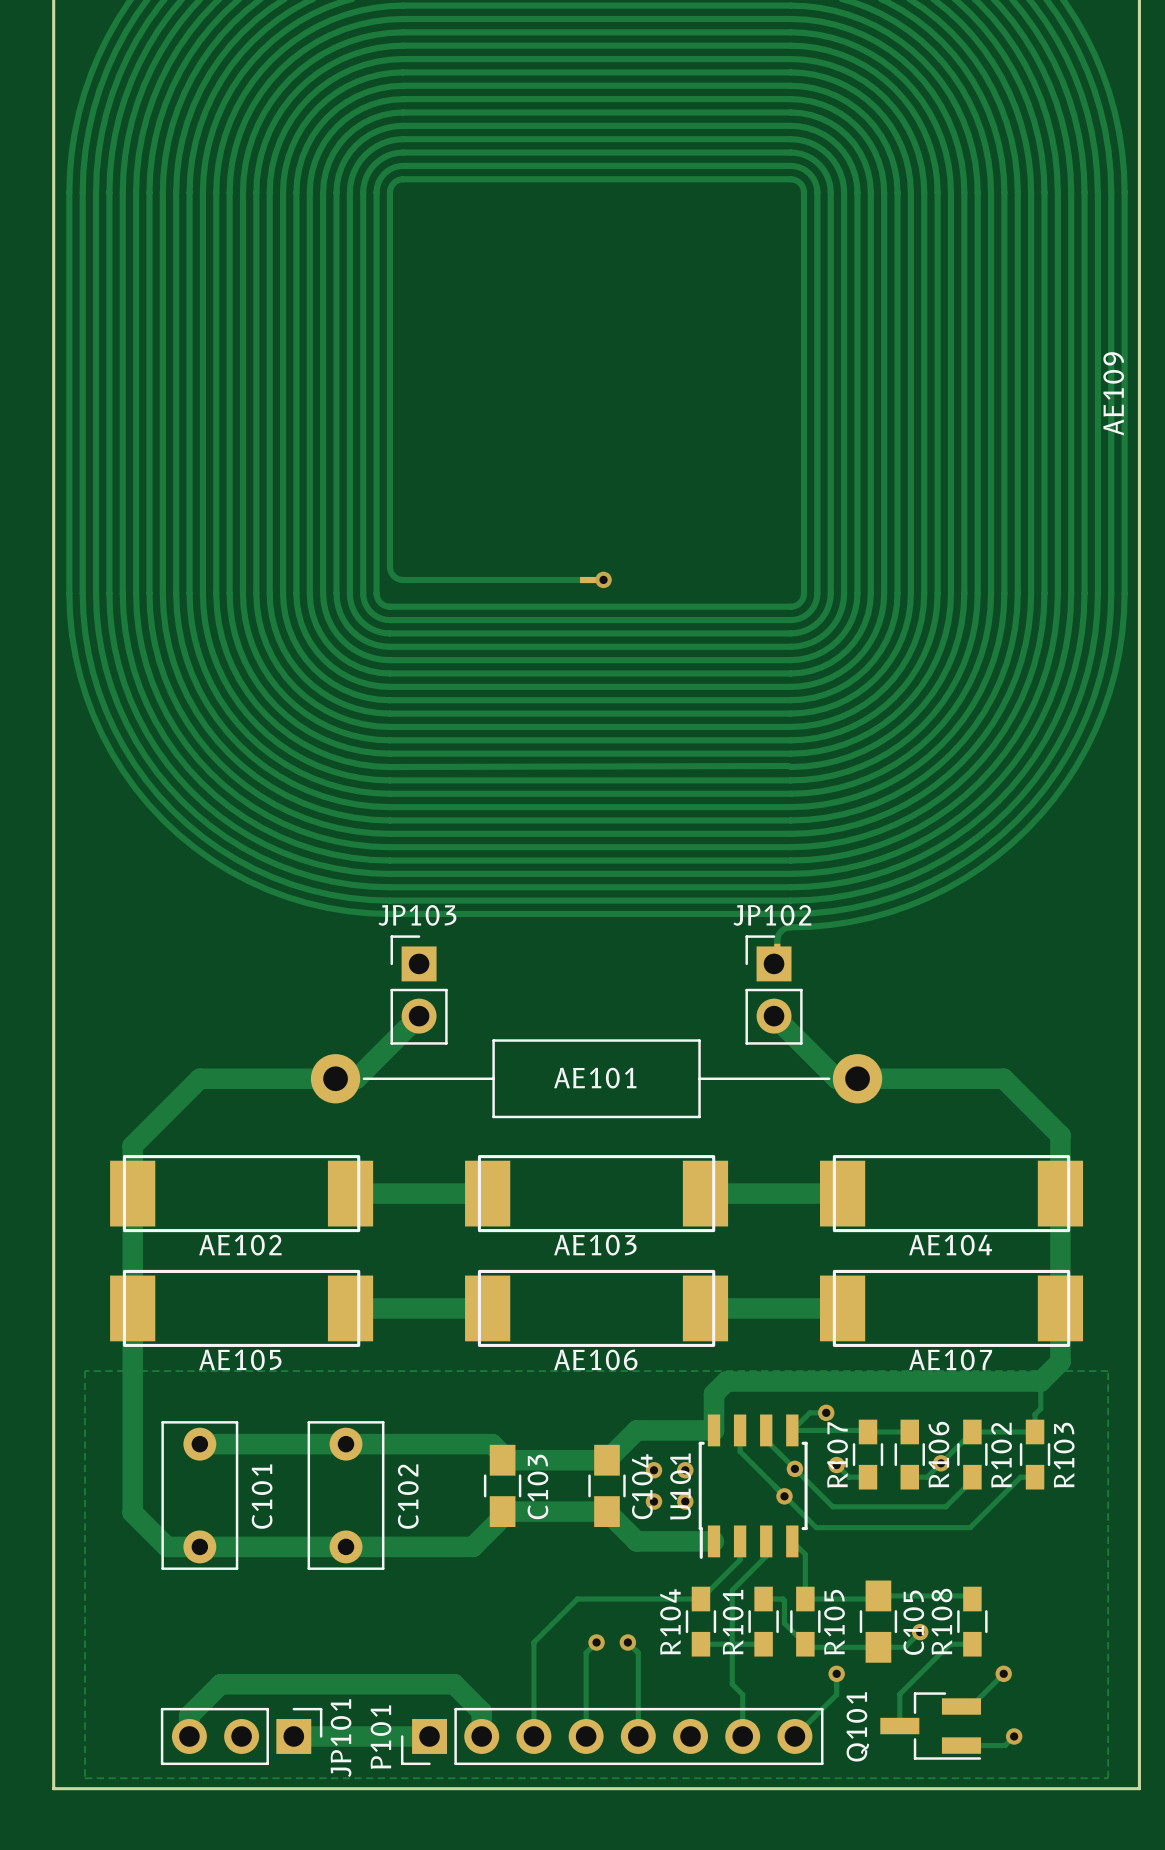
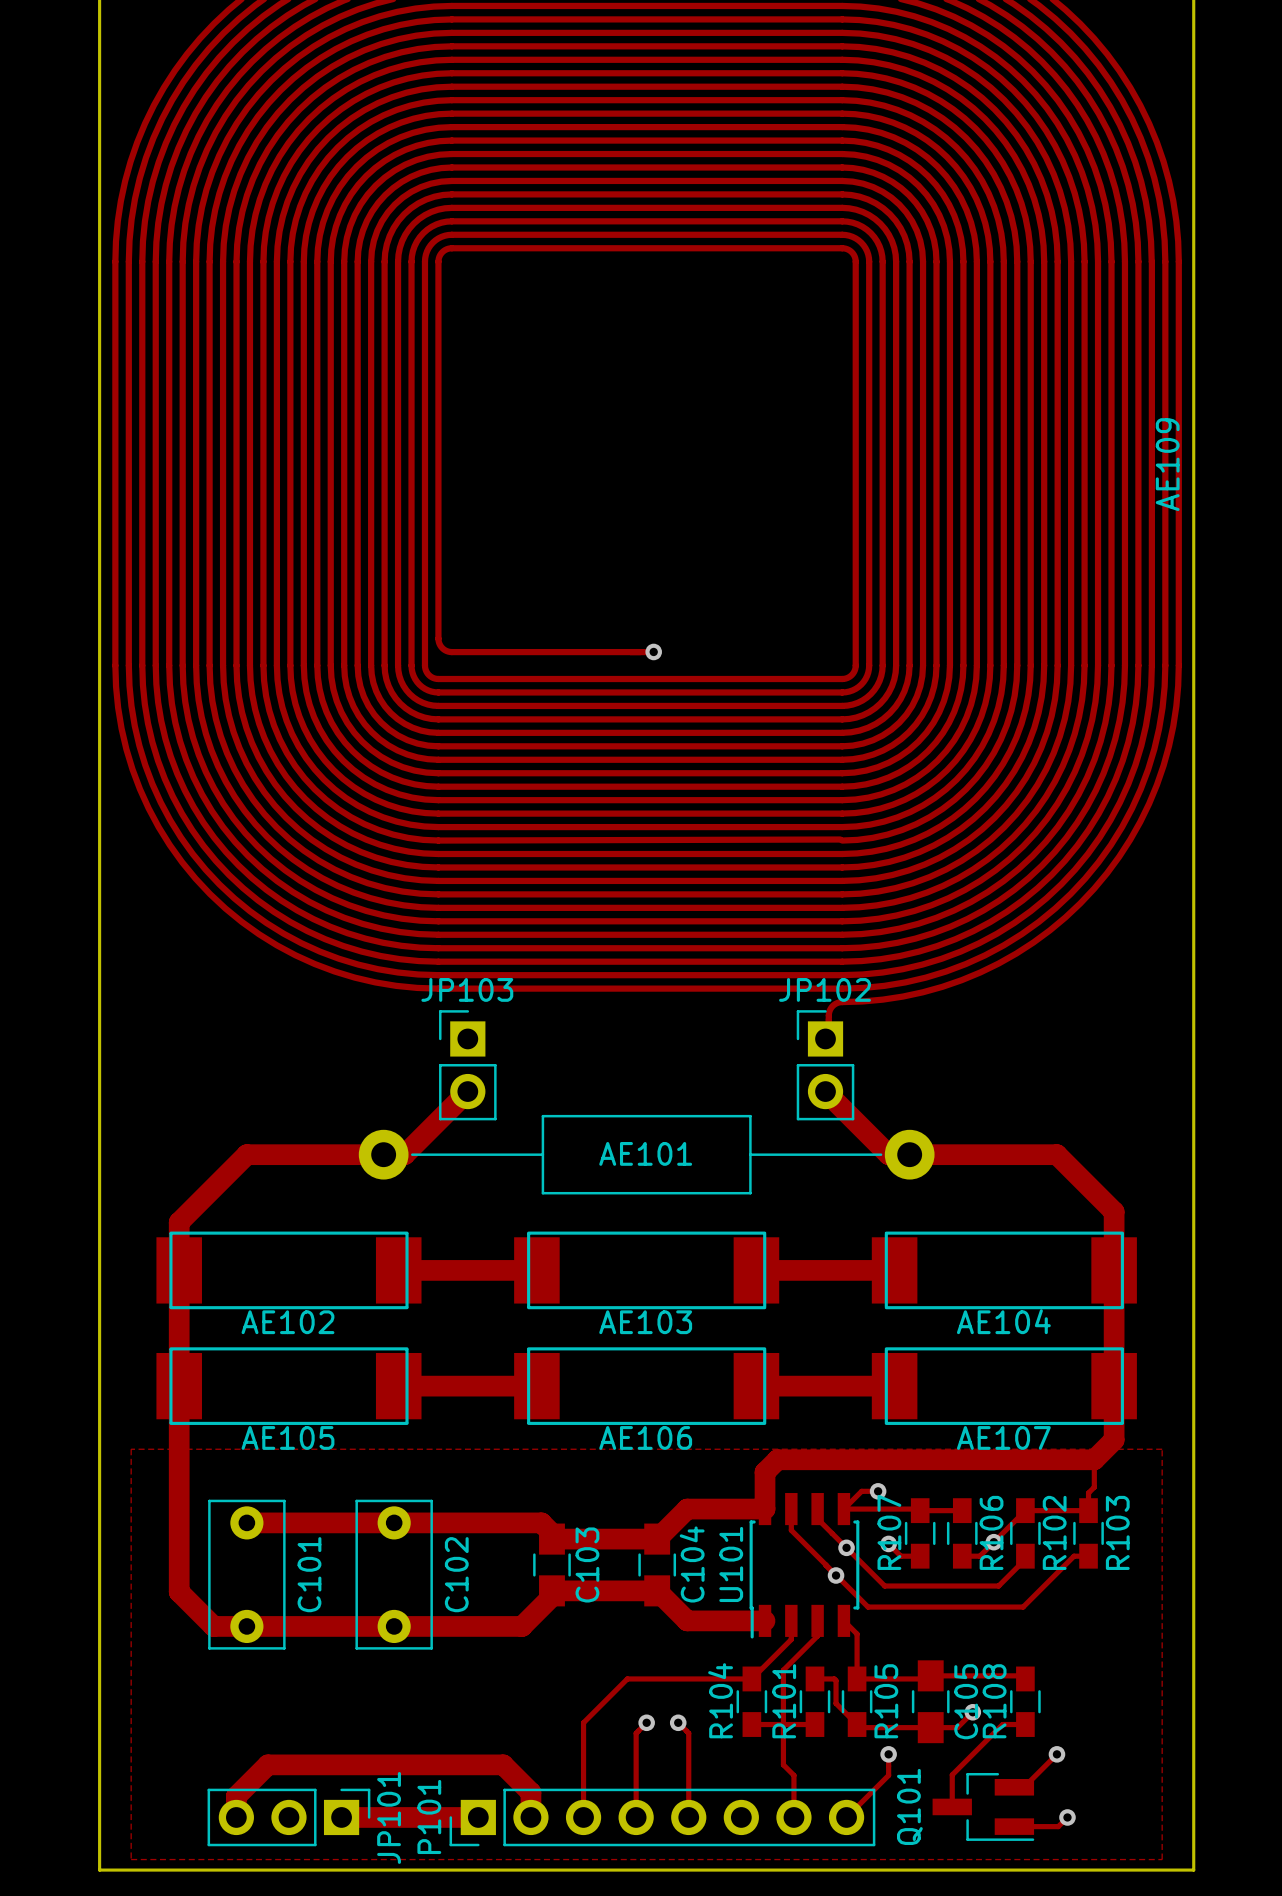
via: (653, 1470) -> none
via: (685, 1470) -> none
via: (653, 1501) -> none
via: (685, 1501) -> none

